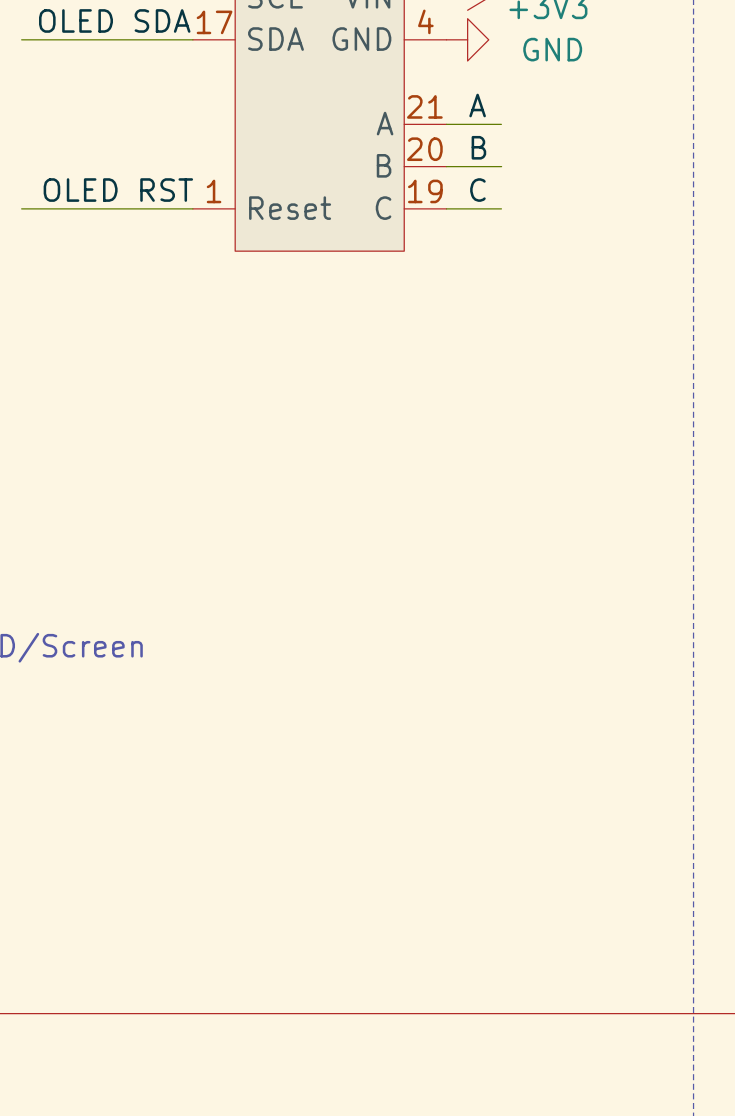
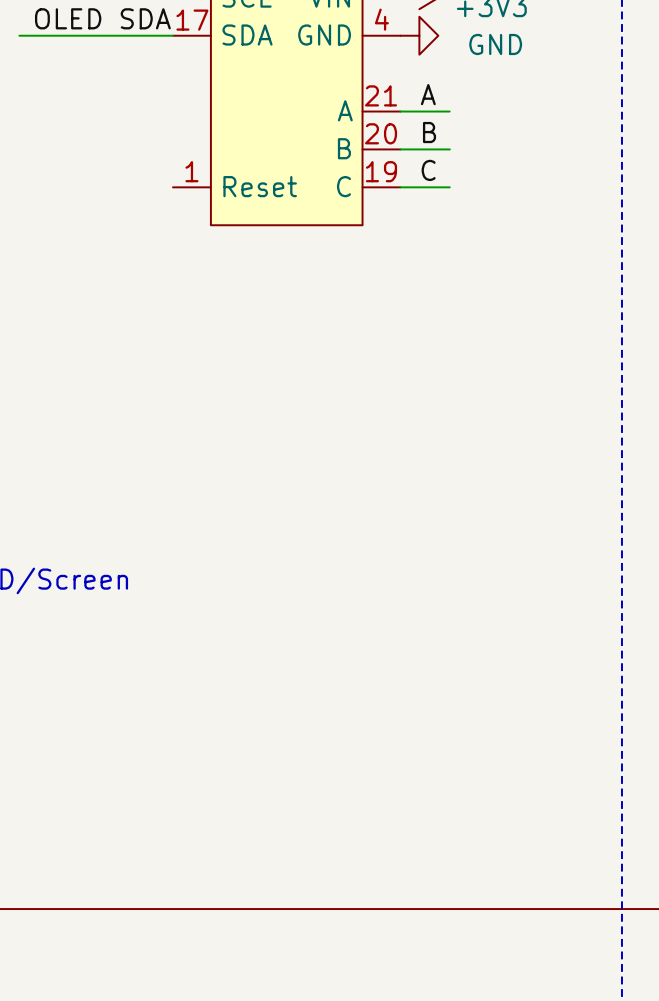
label: OLED RST (118, 190) -> none
wire: (21, 208) (192, 208) -> none

